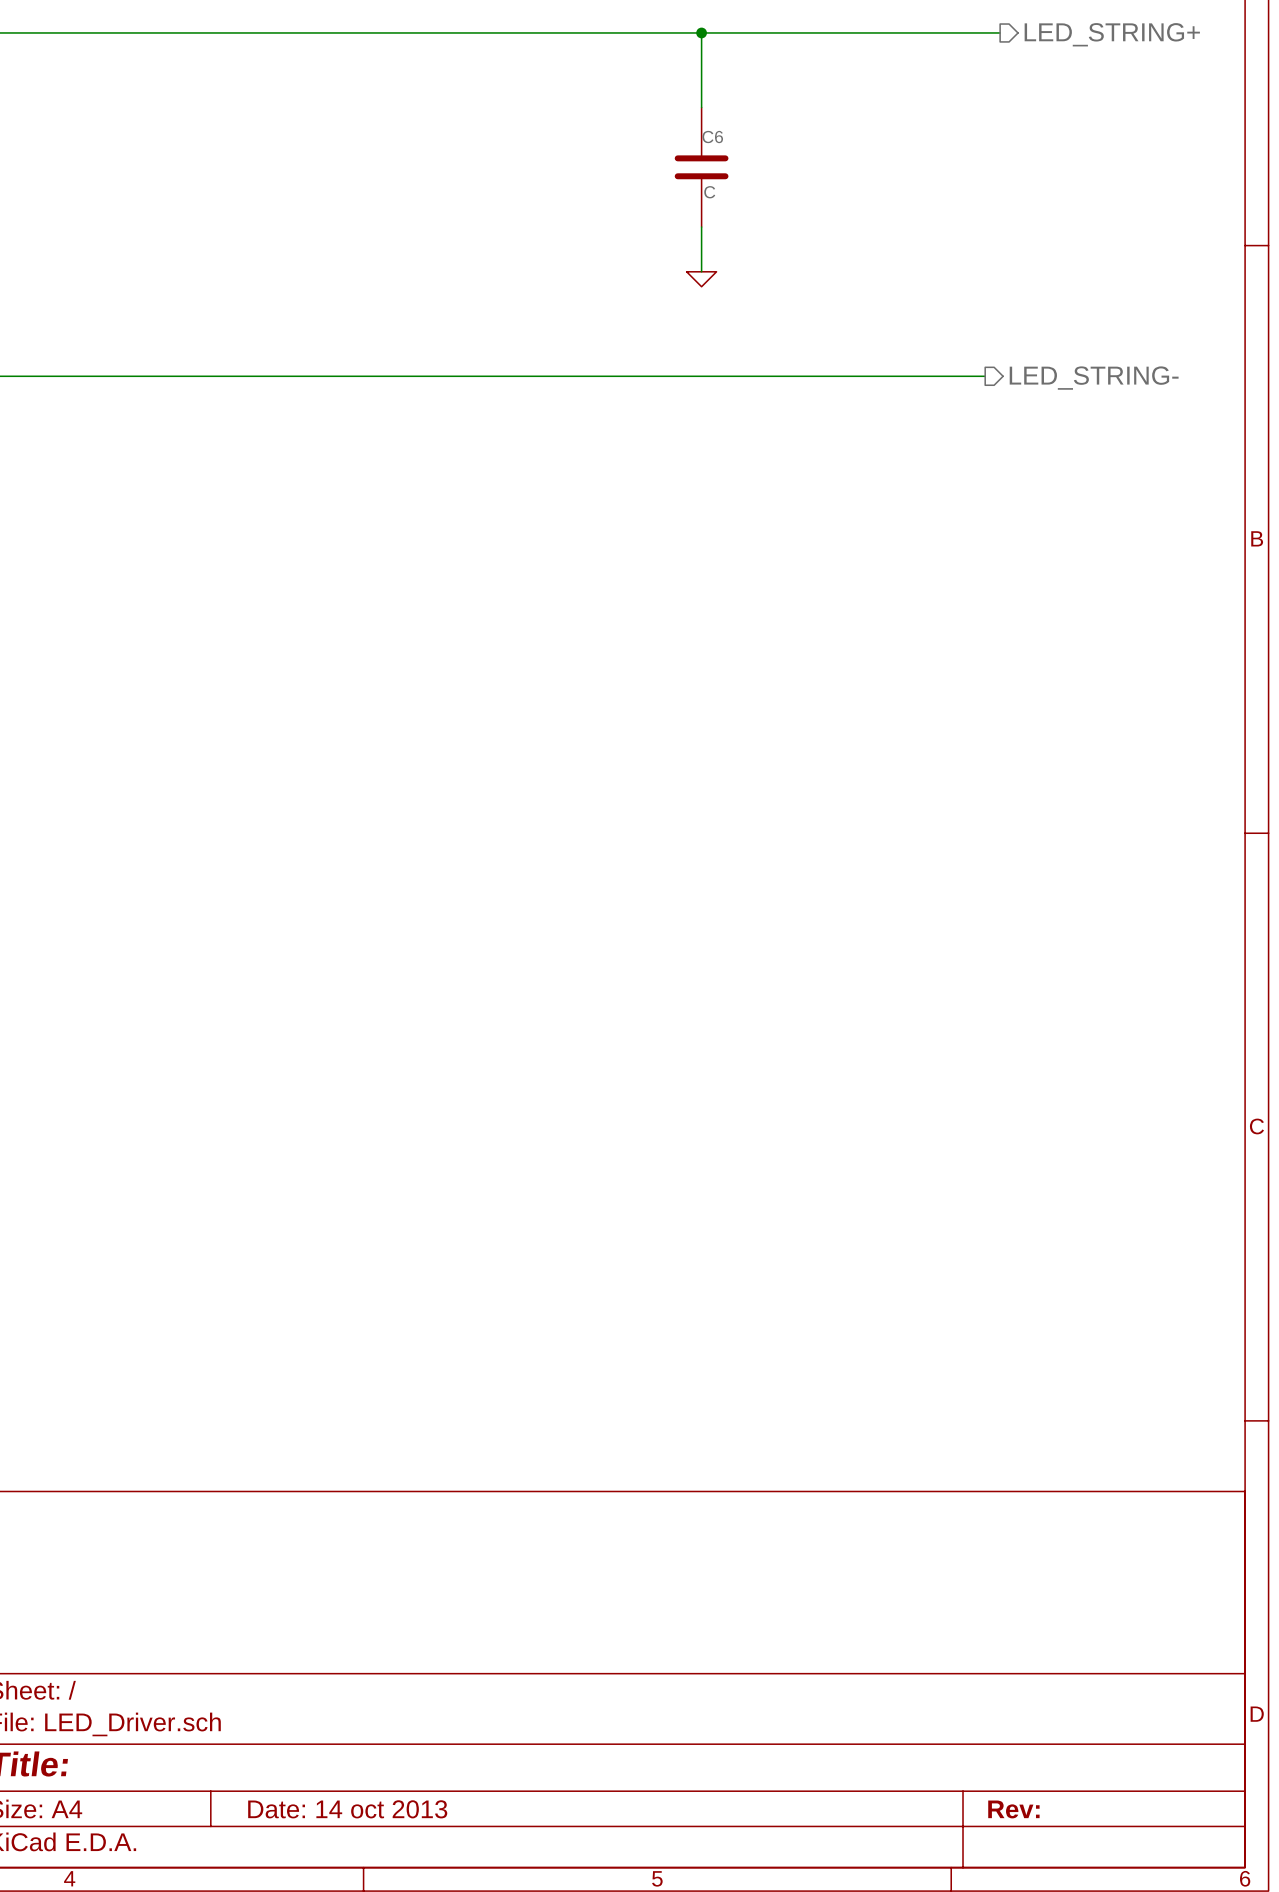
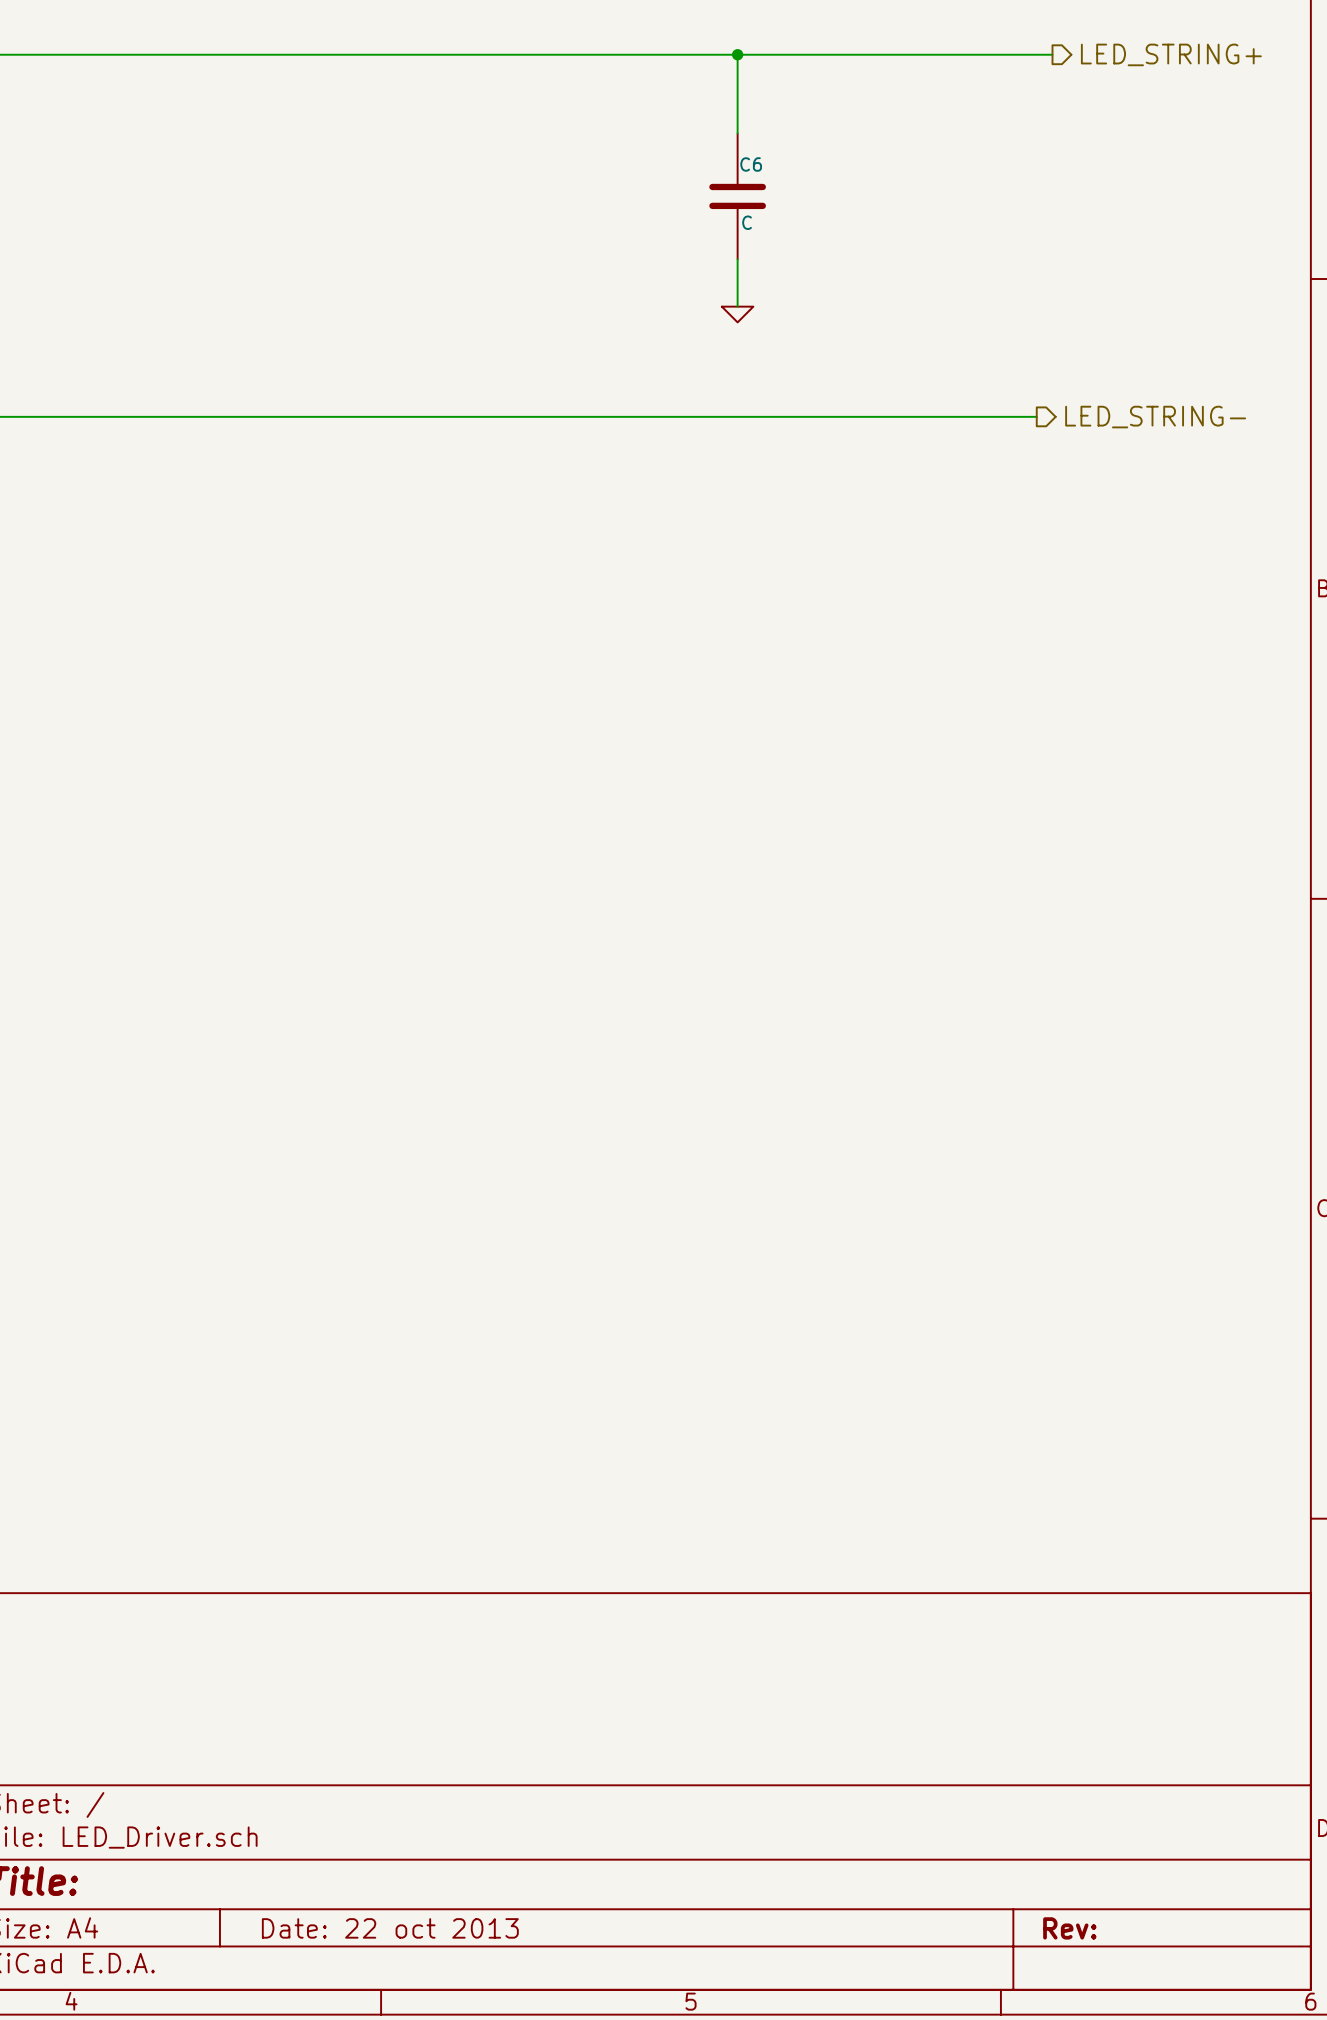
title block: Date: 14 oct 2013 (347, 1809) -> Date: 22 oct 2013 (390, 1928)

